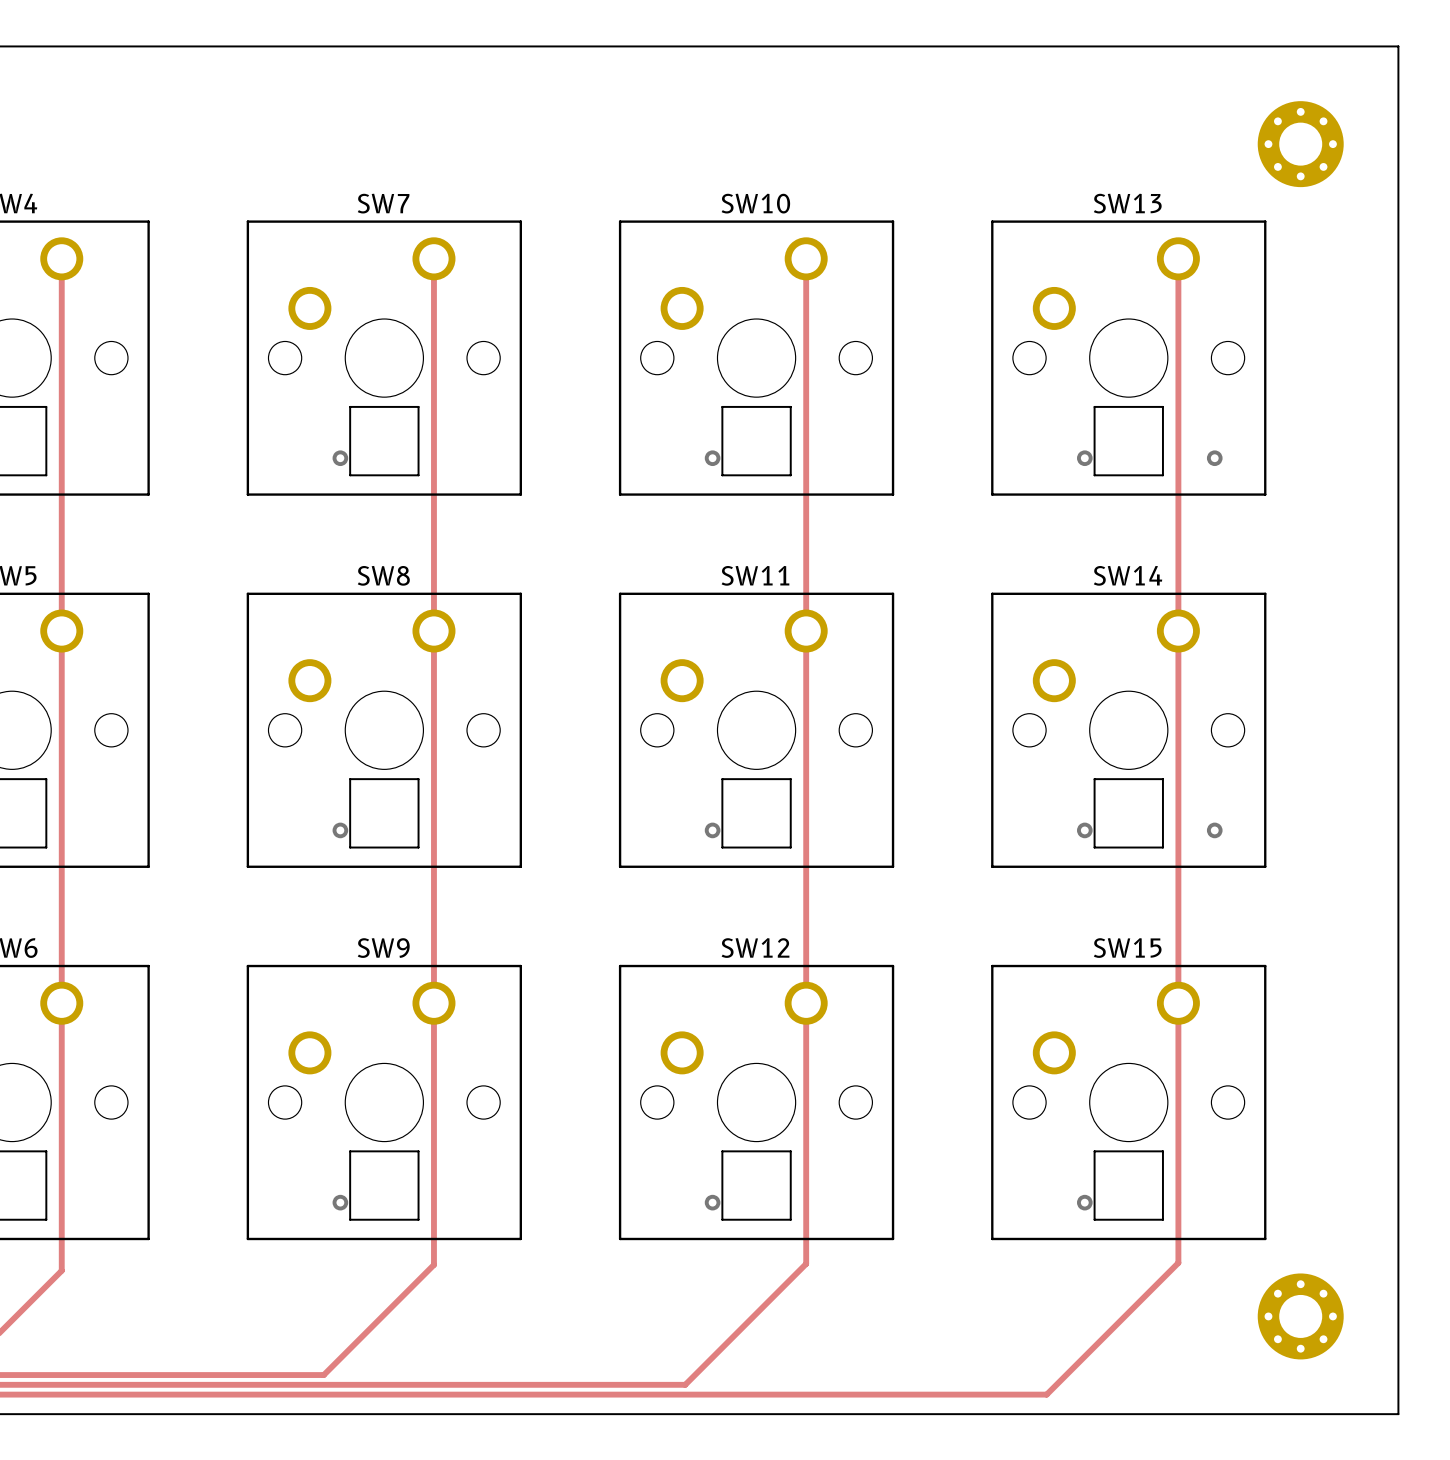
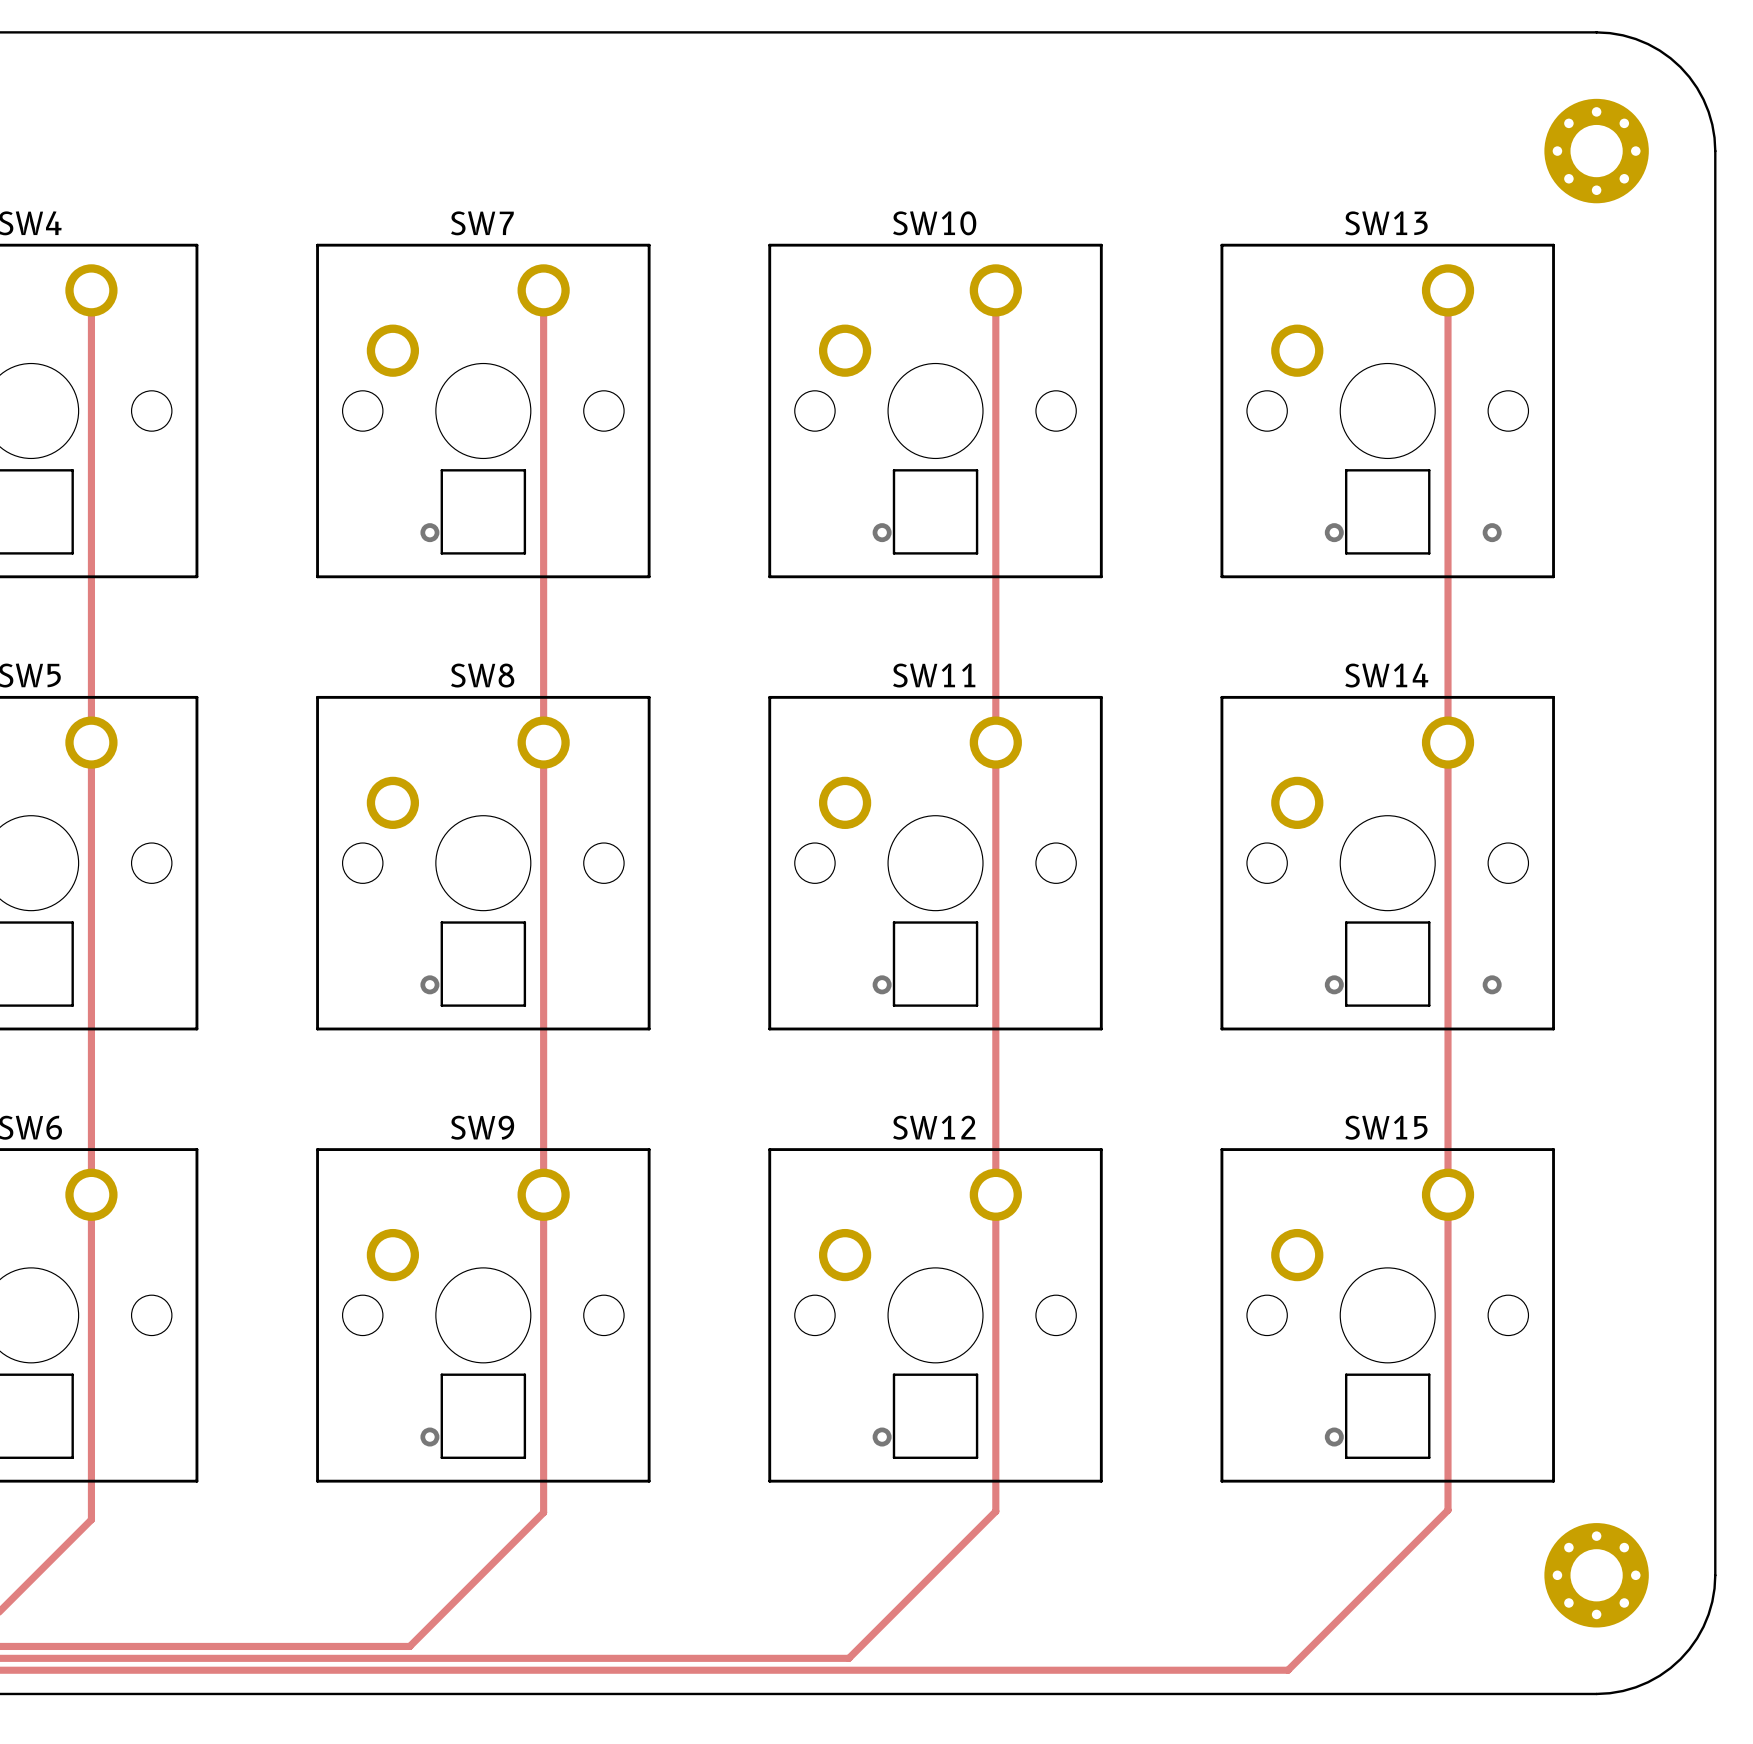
board edge: (1300, 46) (1398, 46) (1398, 144) -> (1596, 32) (1635, 39) (1659, 50) (1680, 67) (1703, 99) (1712, 124) (1715, 151)
board edge: (1398, 1316) (1398, 1414) (1300, 1414) -> (1715, 1575) (1712, 1601) (1703, 1626) (1680, 1659) (1659, 1675) (1635, 1687) (1596, 1693)

